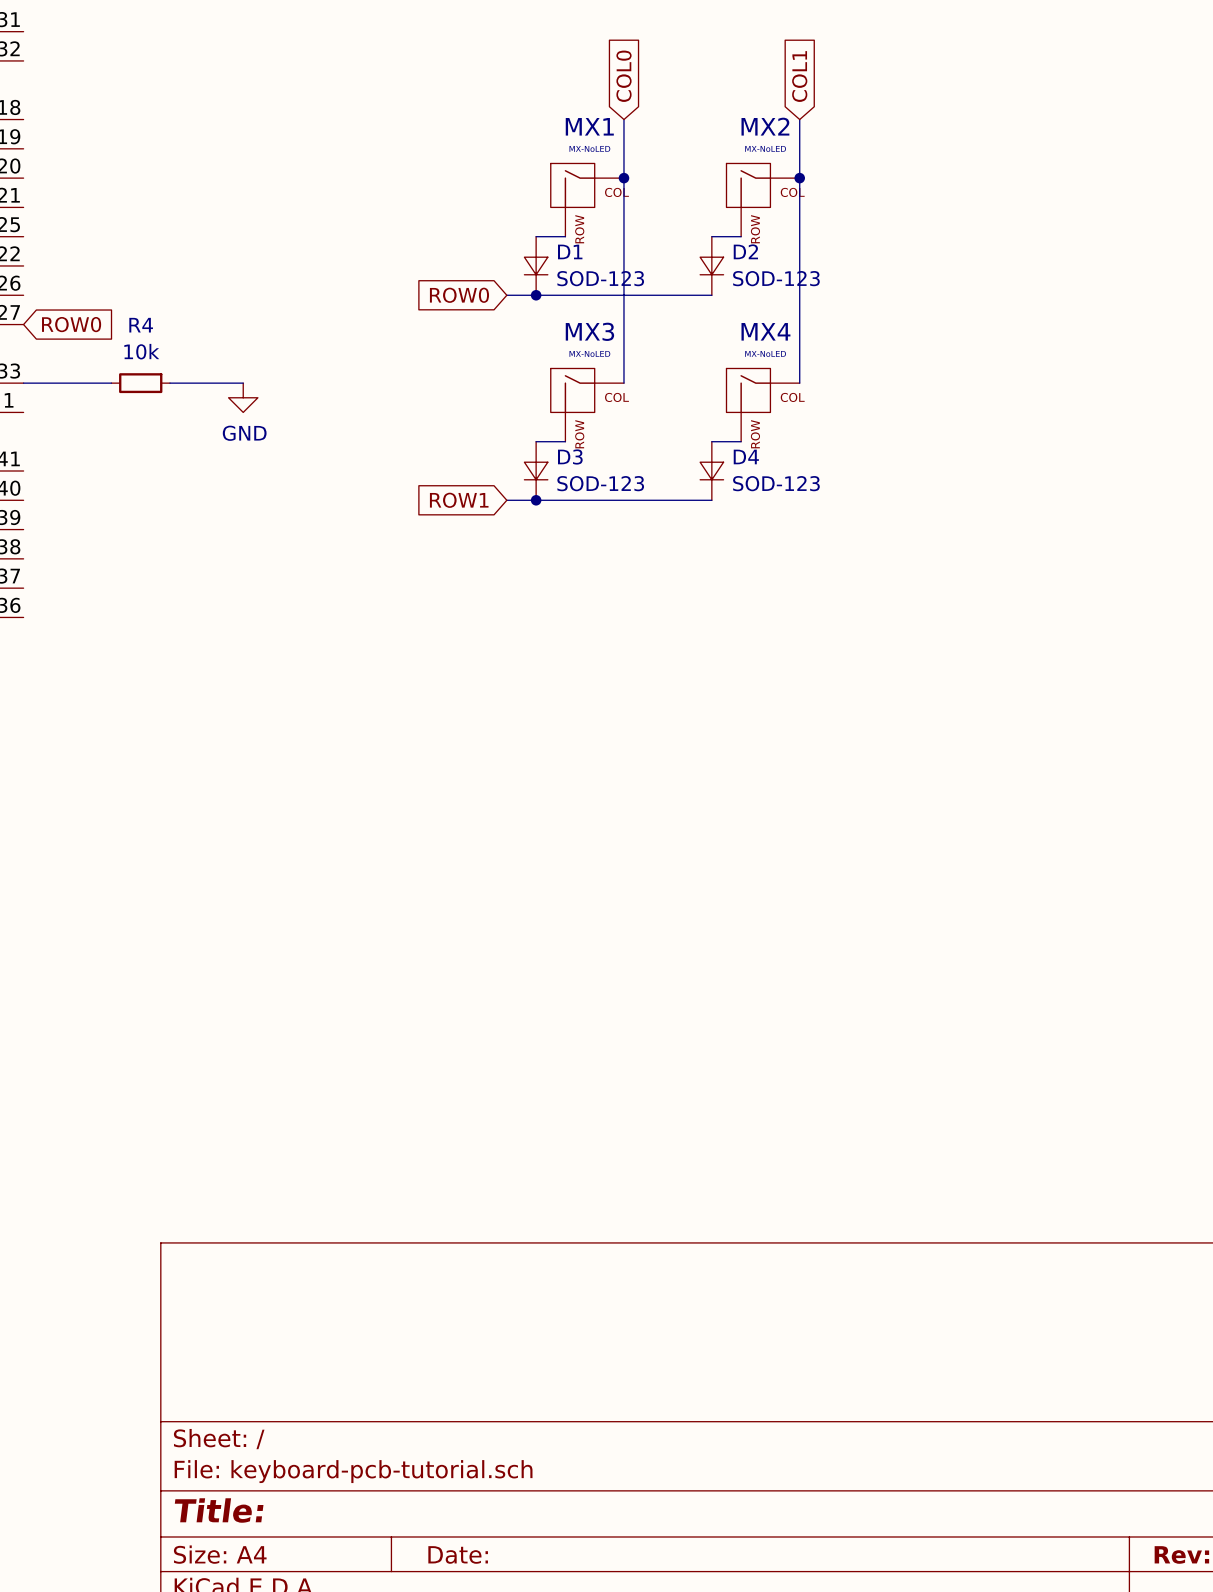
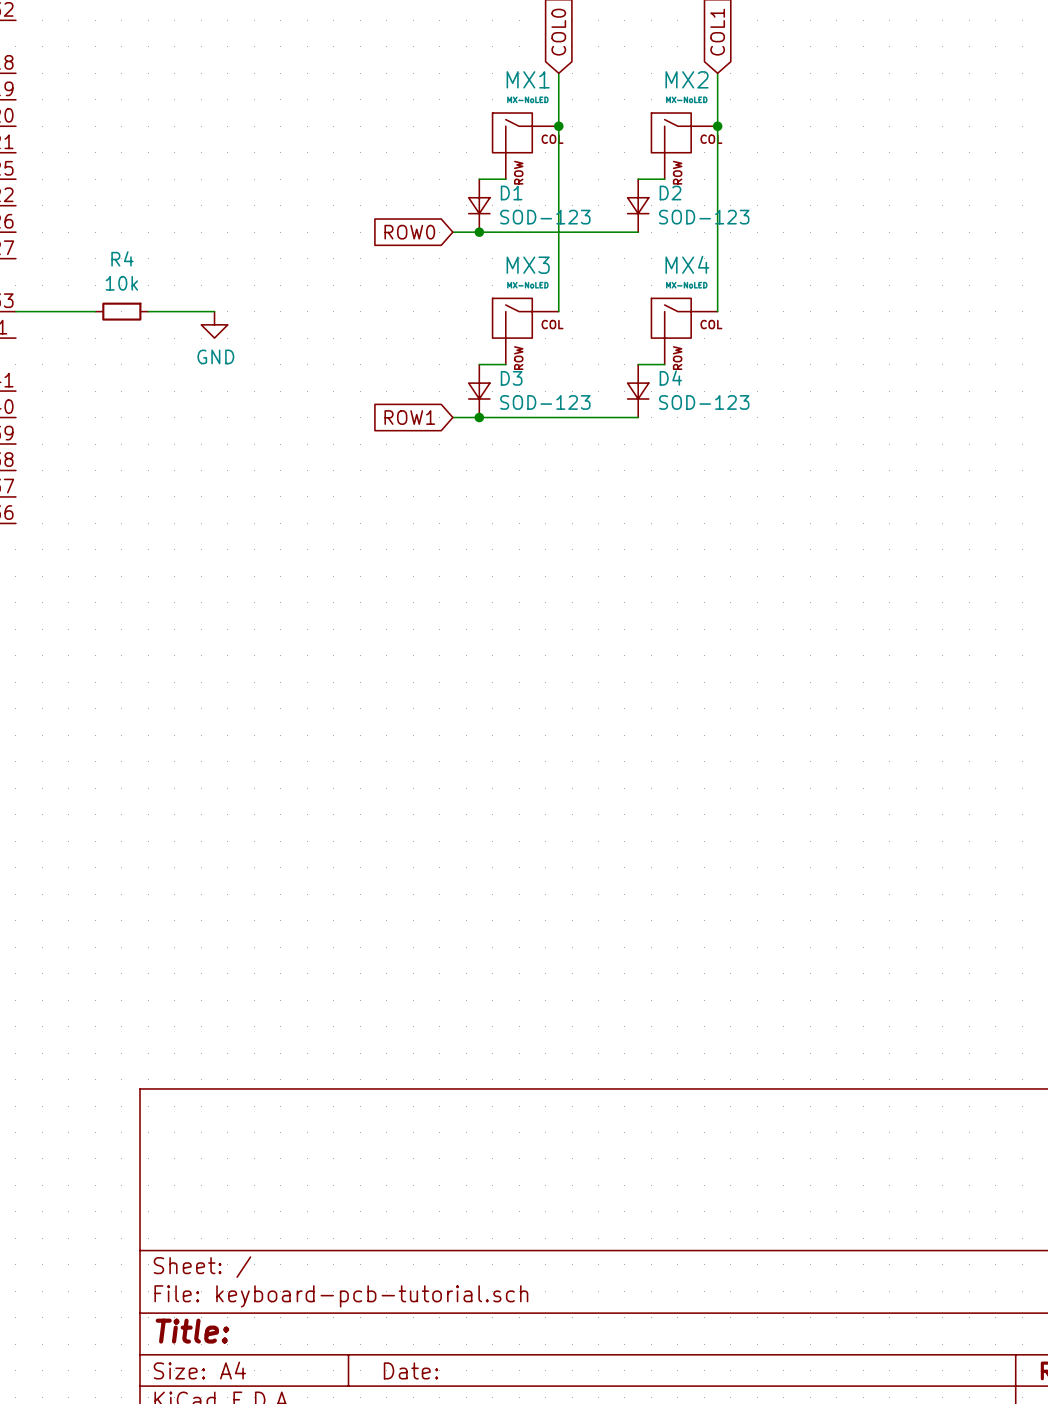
global label: ROW0 (71, 324) -> none

